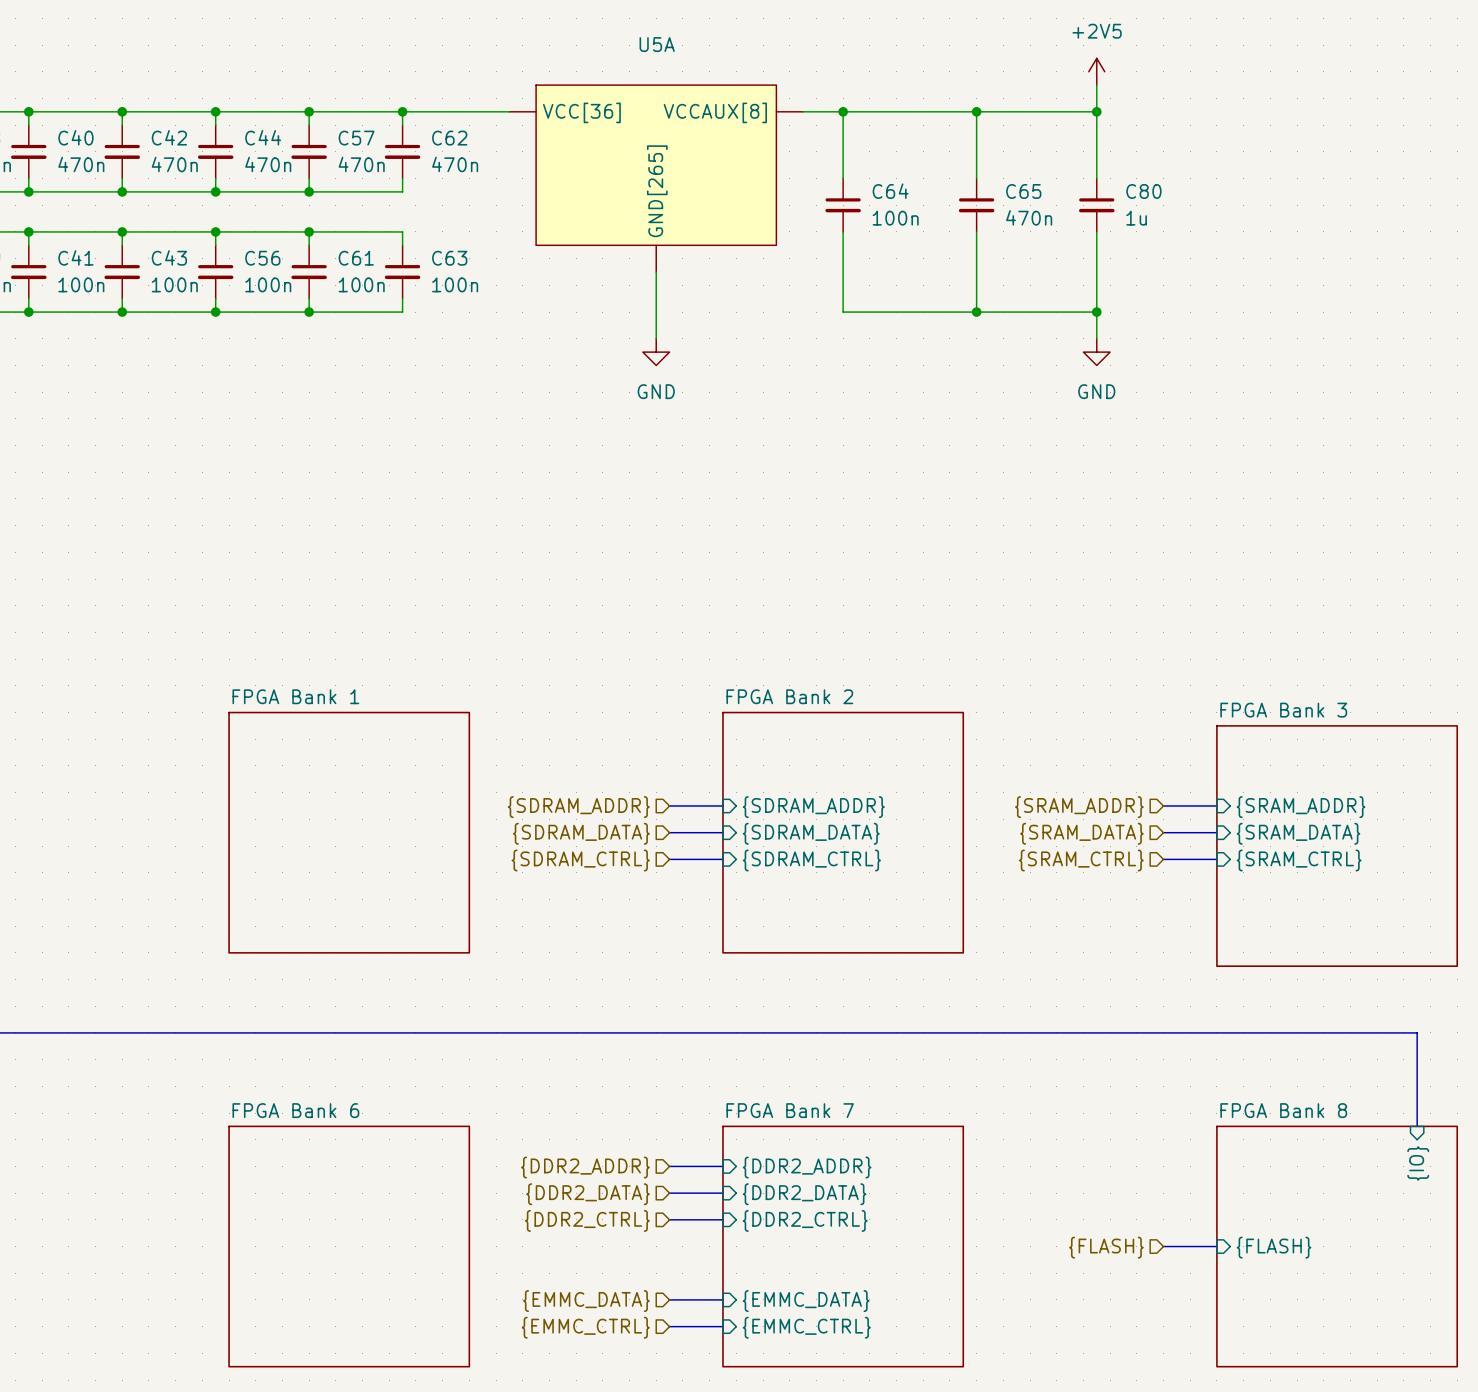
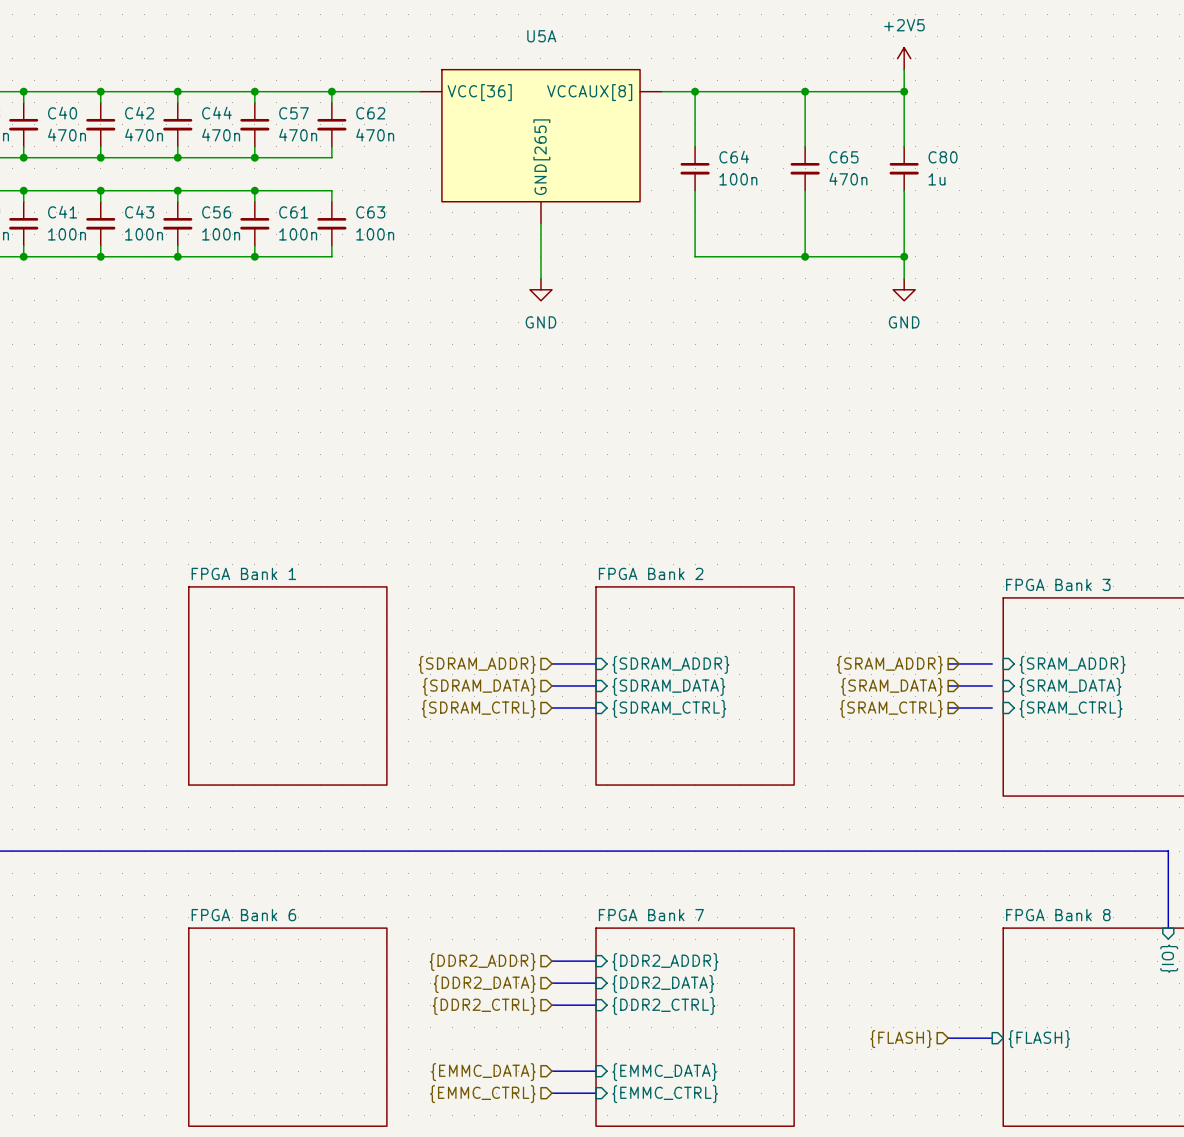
bus: (1203, 805) (1216, 805) -> (948, 663) (959, 663)
bus: (1203, 832) (1216, 832) -> (948, 685) (959, 685)
bus: (1203, 859) (1216, 859) -> (948, 708) (959, 708)
bus: (1163, 1246) (1216, 1246) -> (948, 1038) (992, 1038)
hierarchical label position: {FLASH} (1106, 1247) -> {FLASH} (901, 1039)
sheet pin position: {FLASH} (1274, 1247) -> {FLASH} (1039, 1039)

